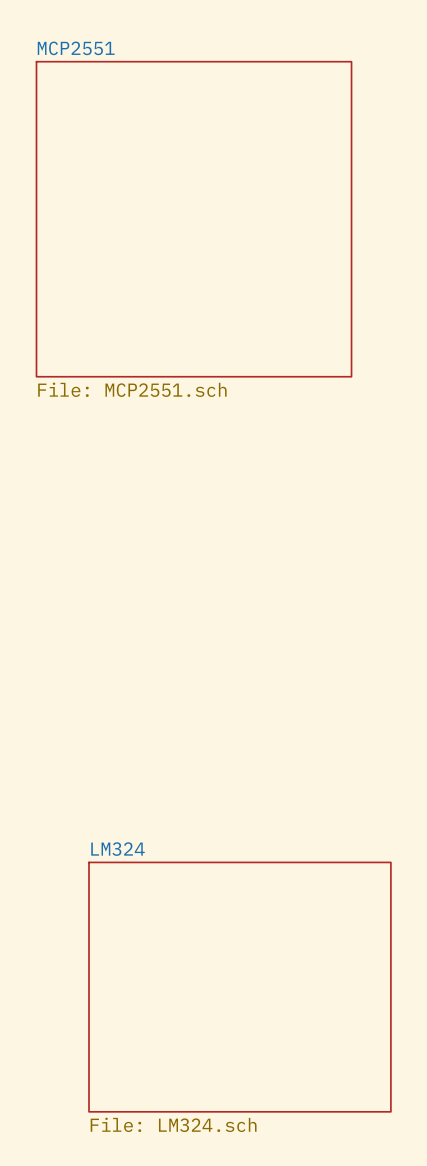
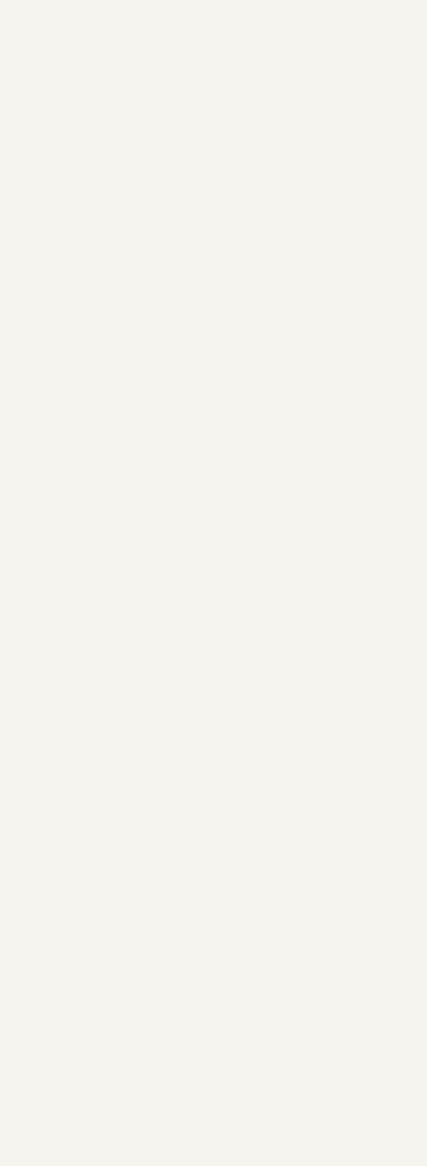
sheet MCP2551: File: MCP2551.sch (194, 219) -> none
sheet LM324: File: LM324.sch (239, 987) -> none

